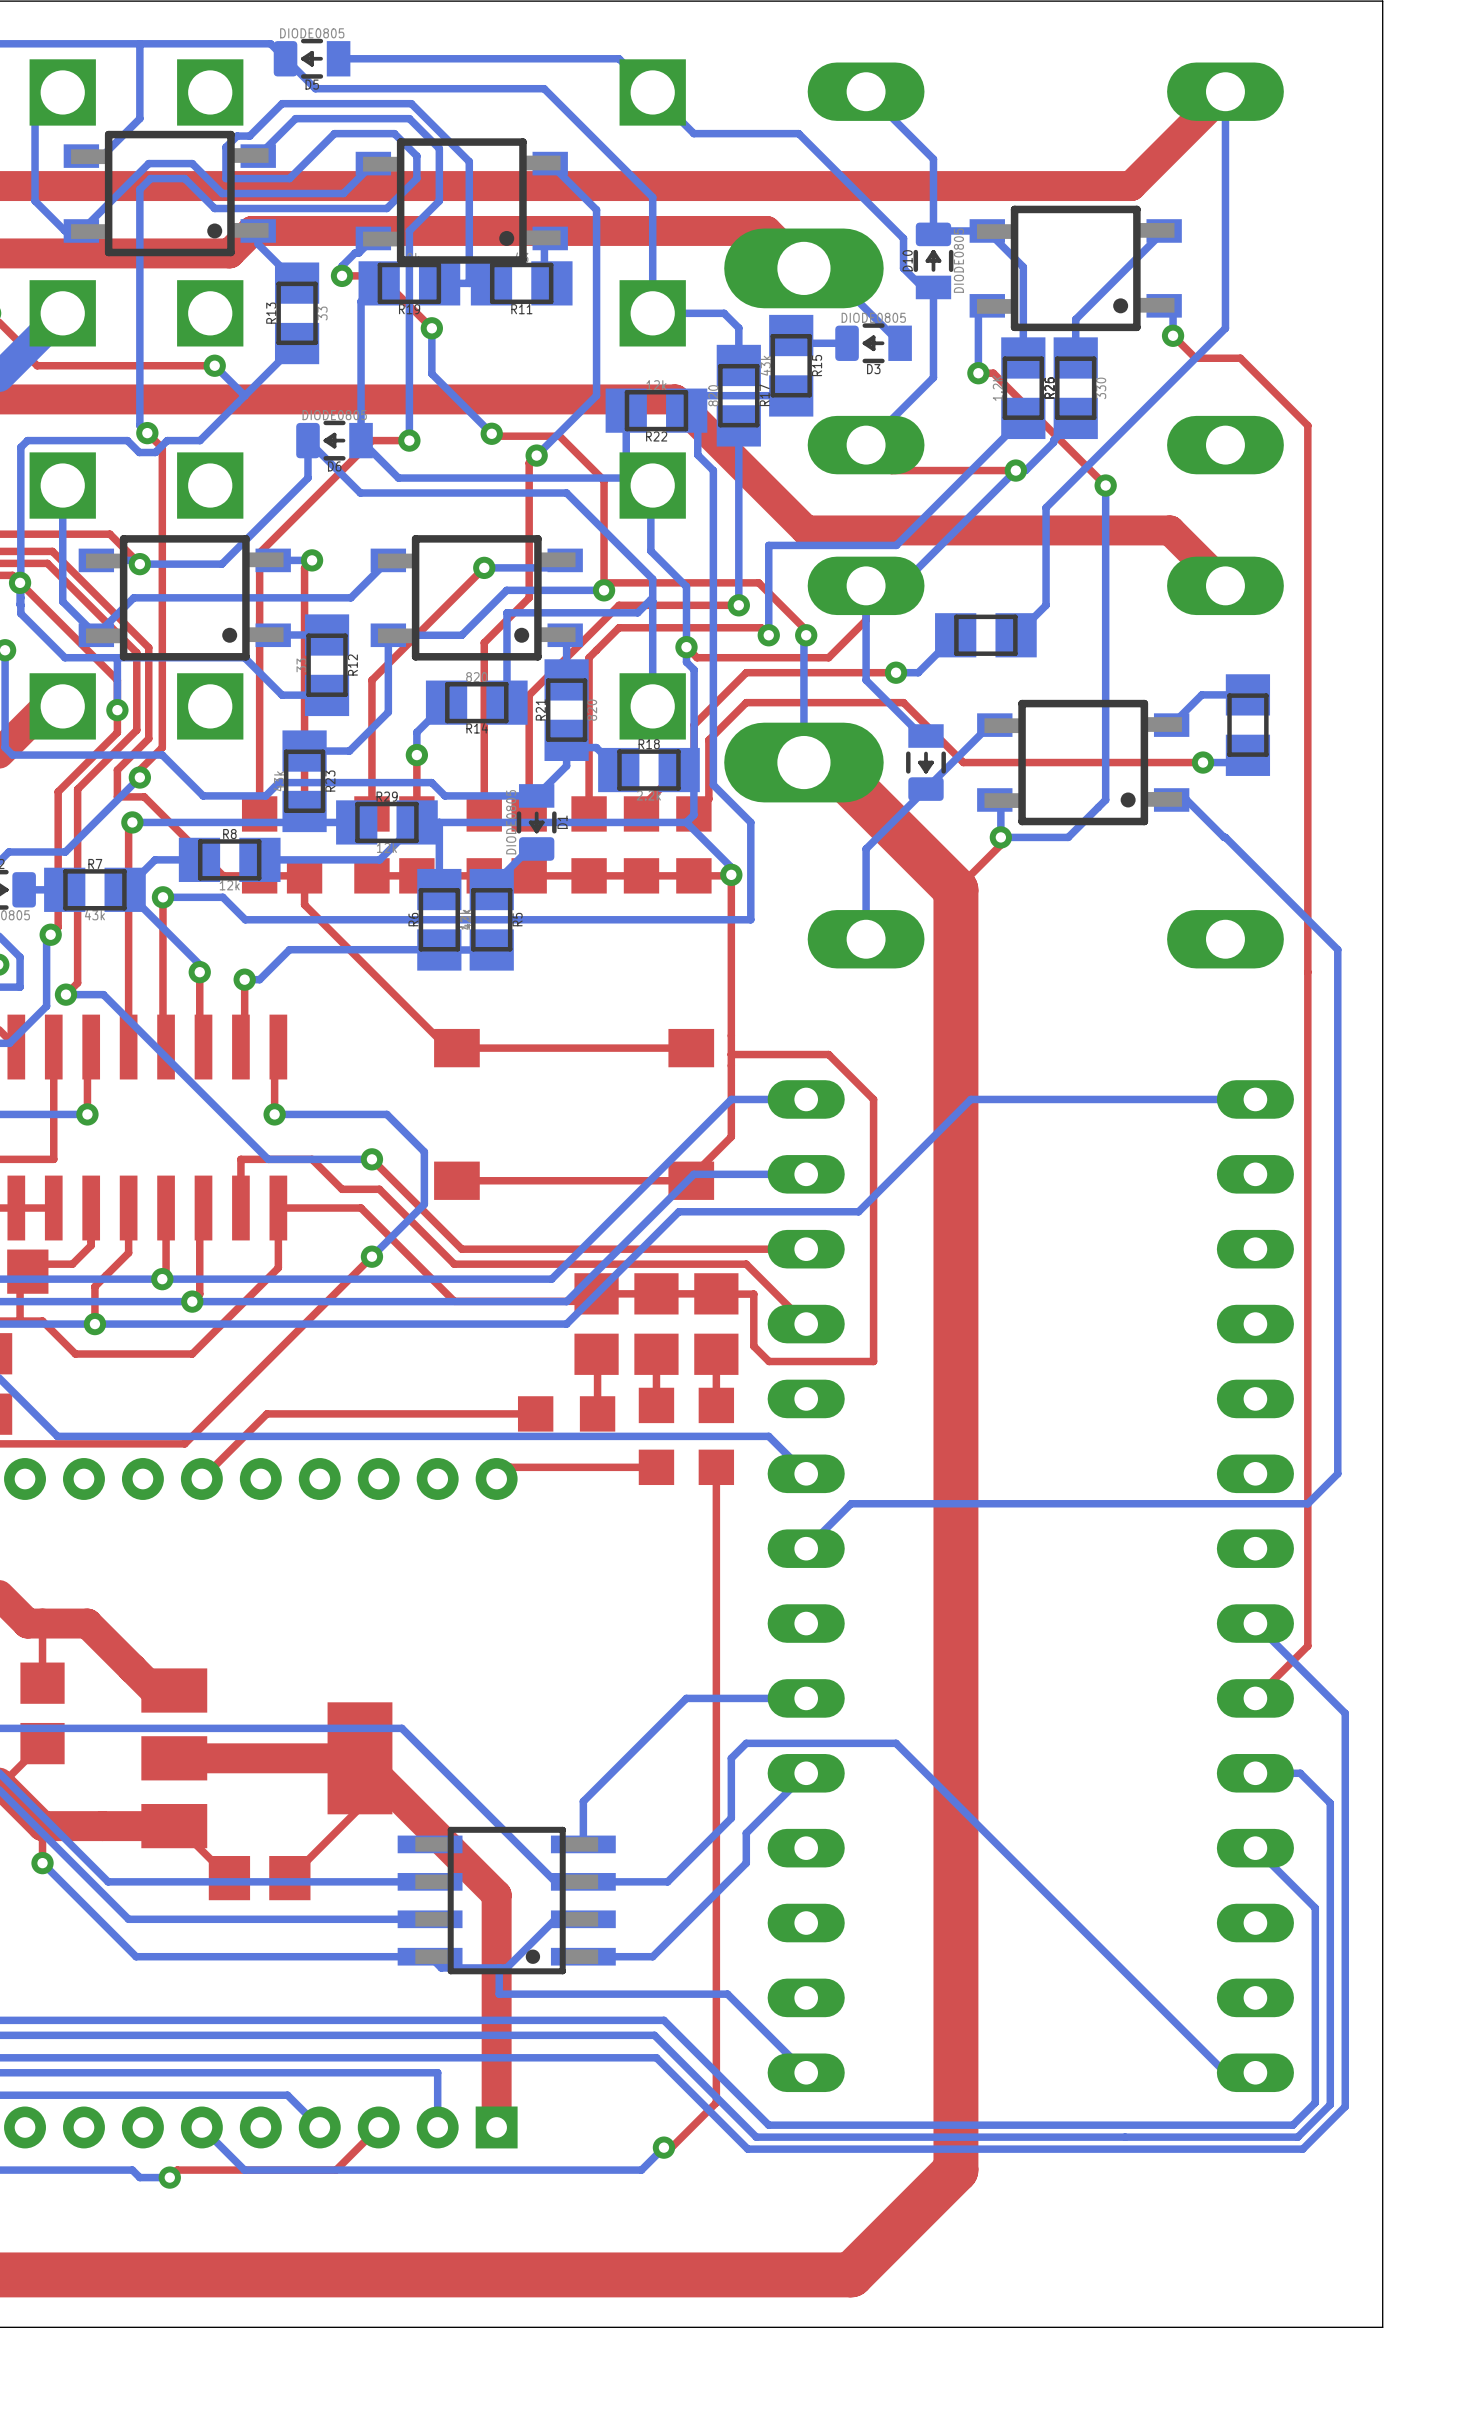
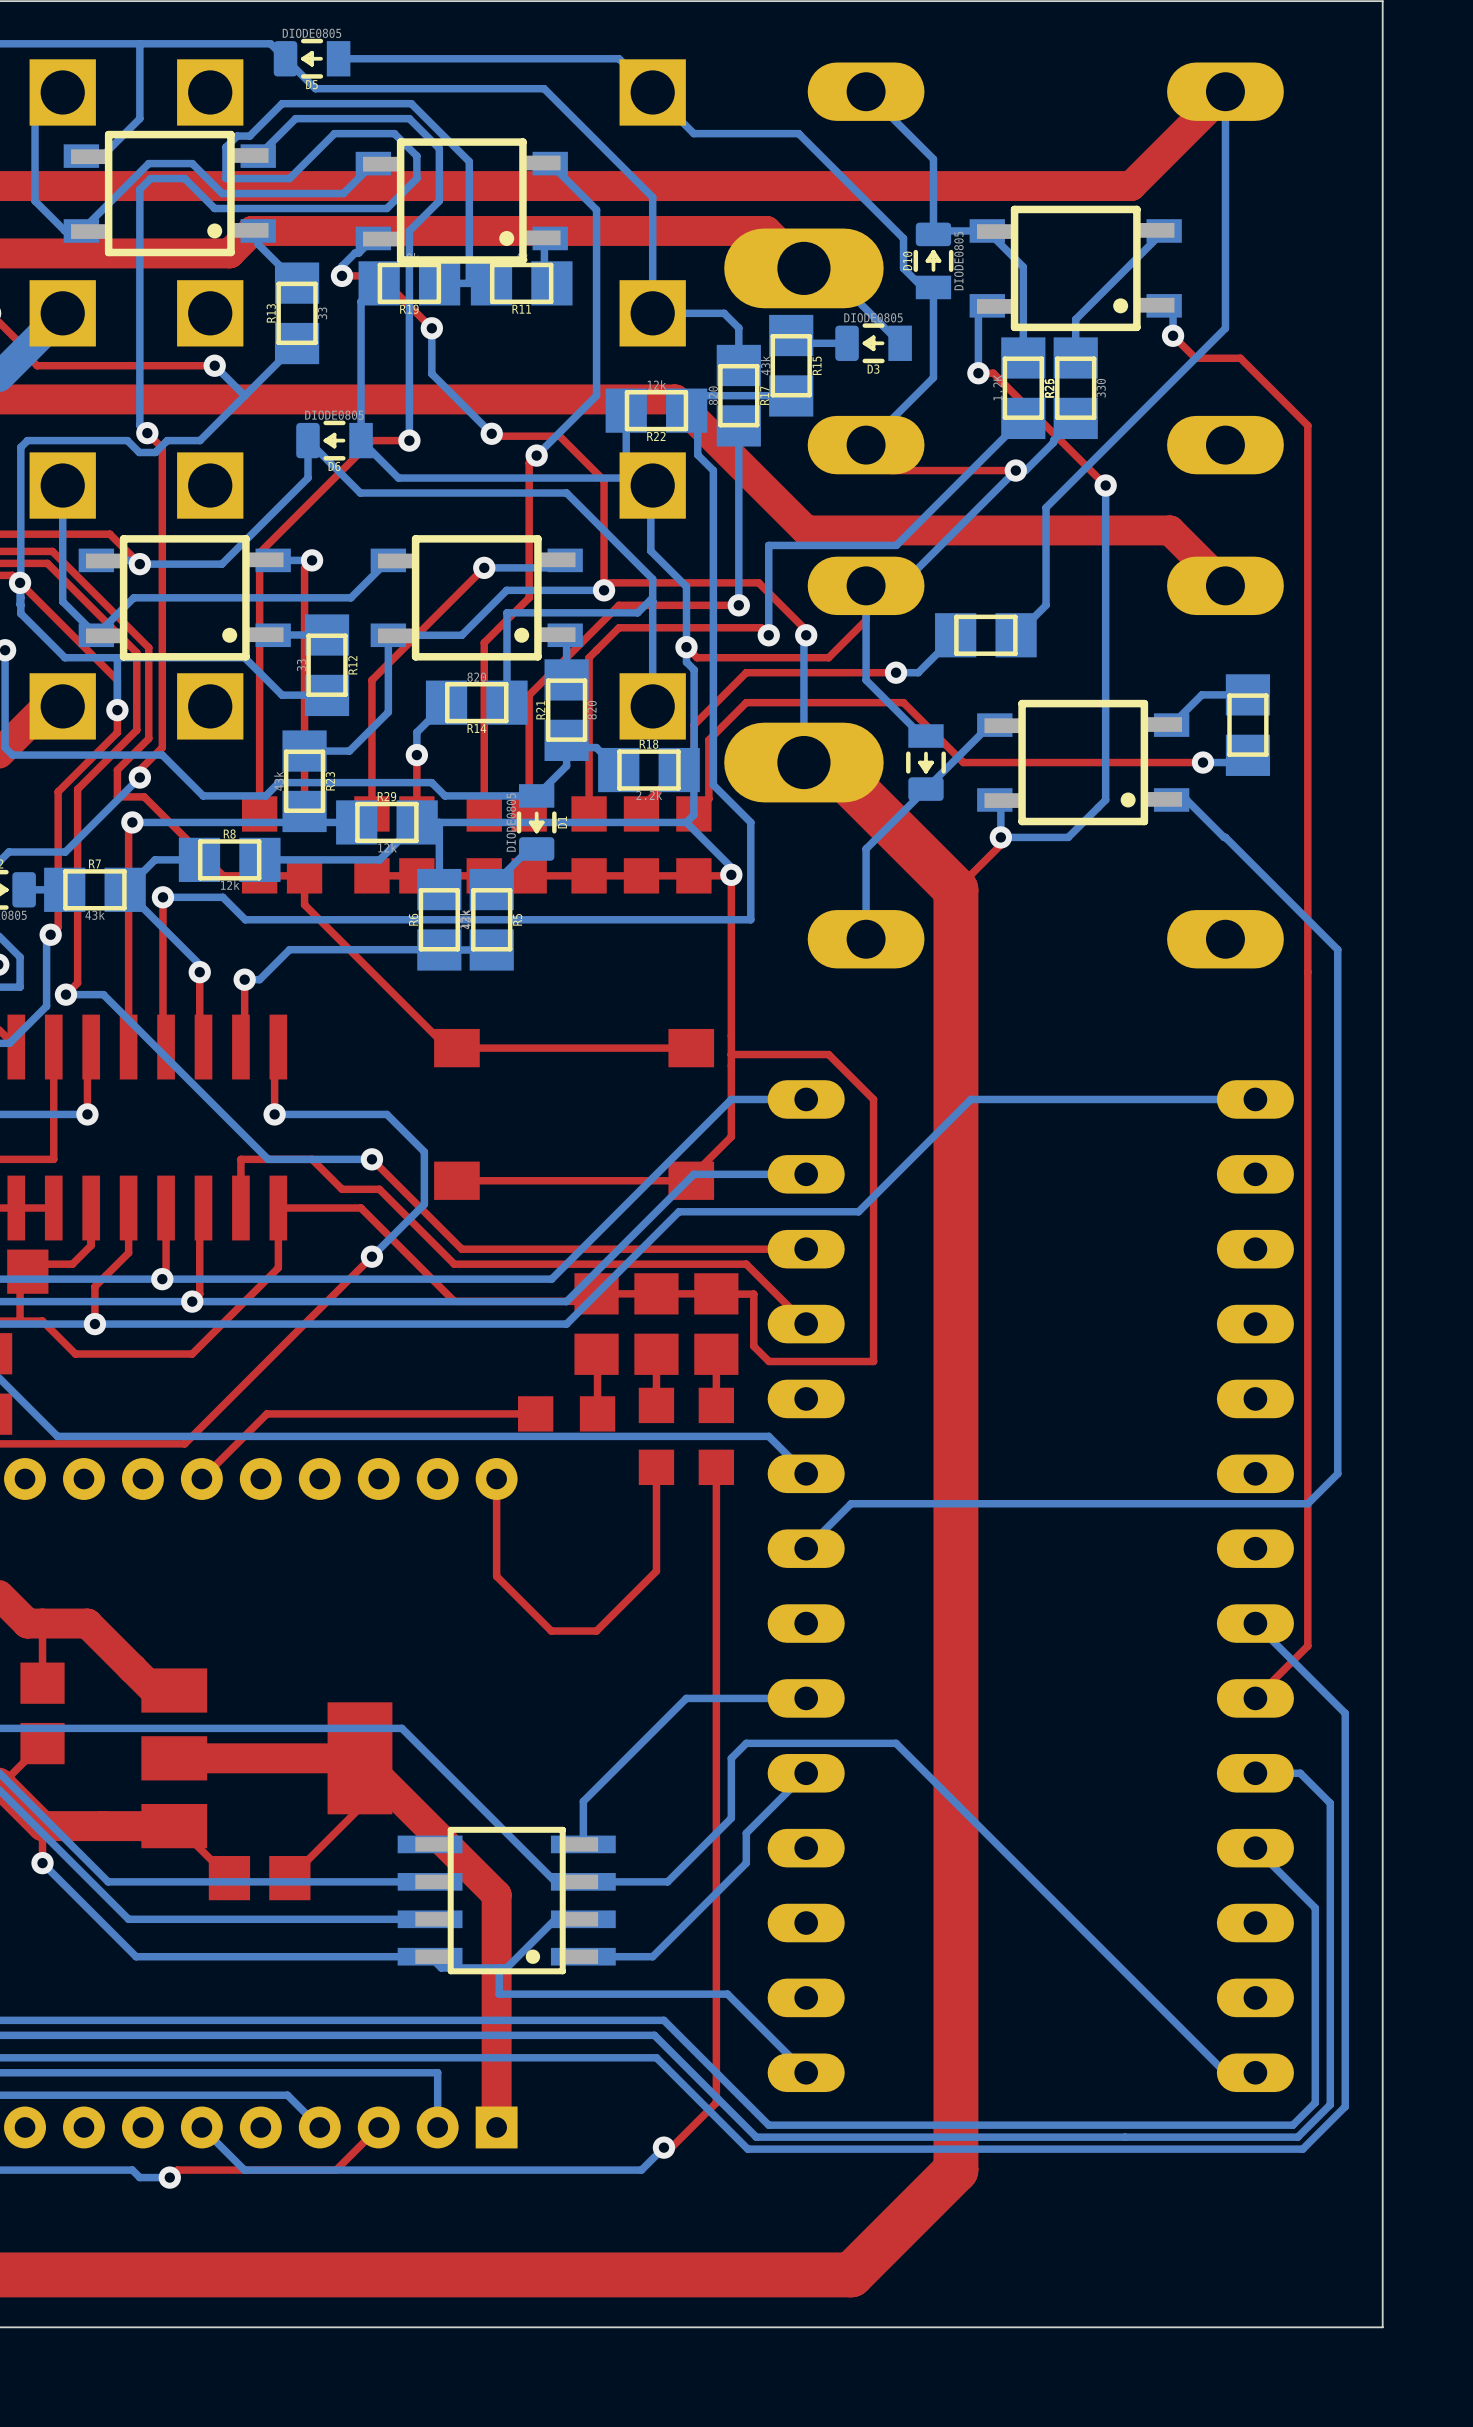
top track: (656, 1467) (510, 1467) (496, 1481) -> (656, 1467) (656, 1571) (596, 1631) (551, 1631) (496, 1576) (496, 1481)

